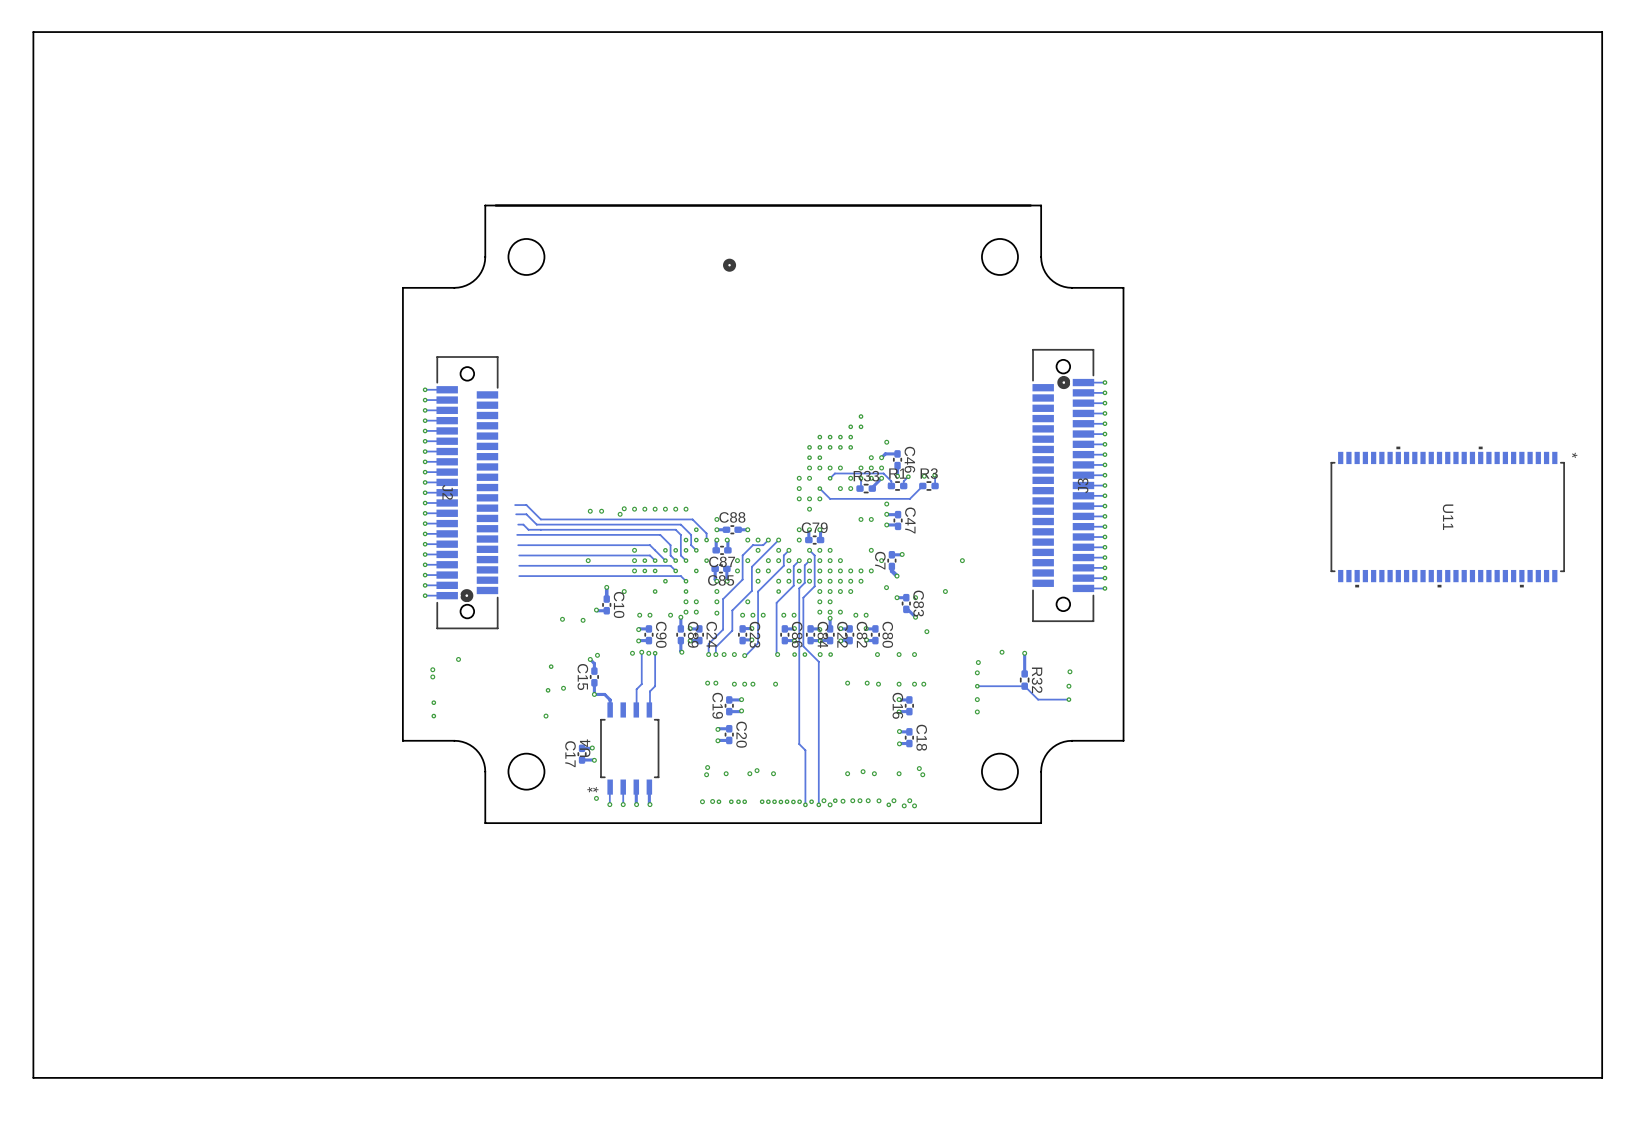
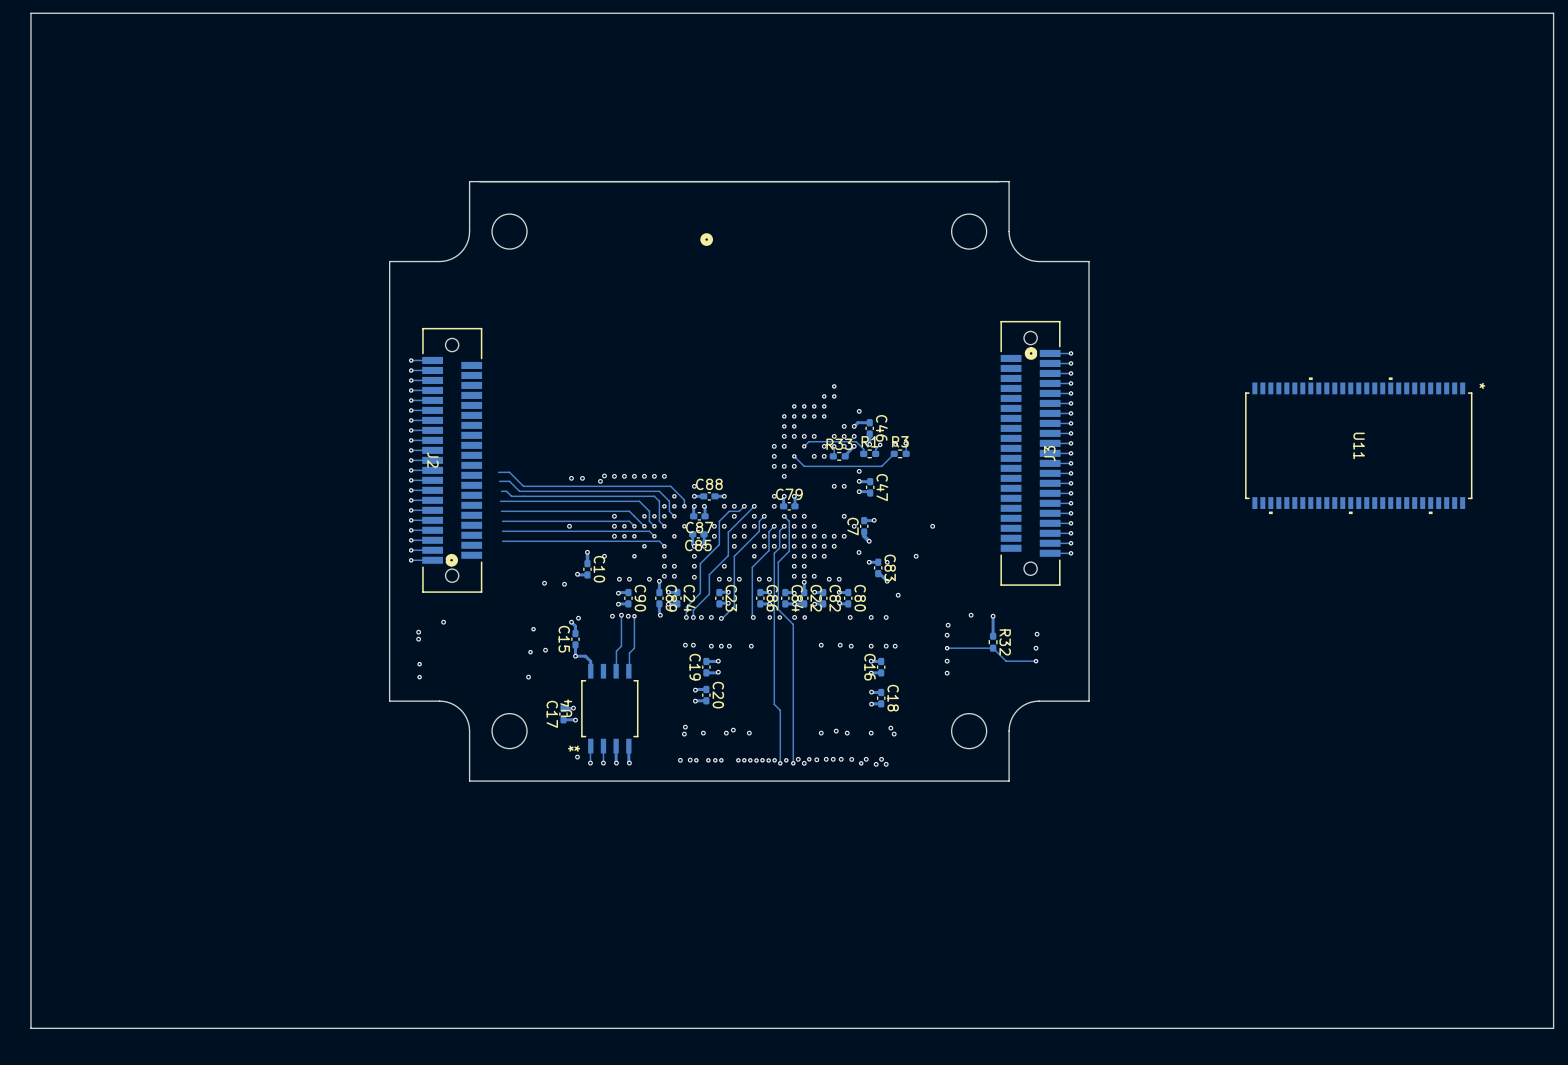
U11 position: (1447, 517) -> (1358, 445)

